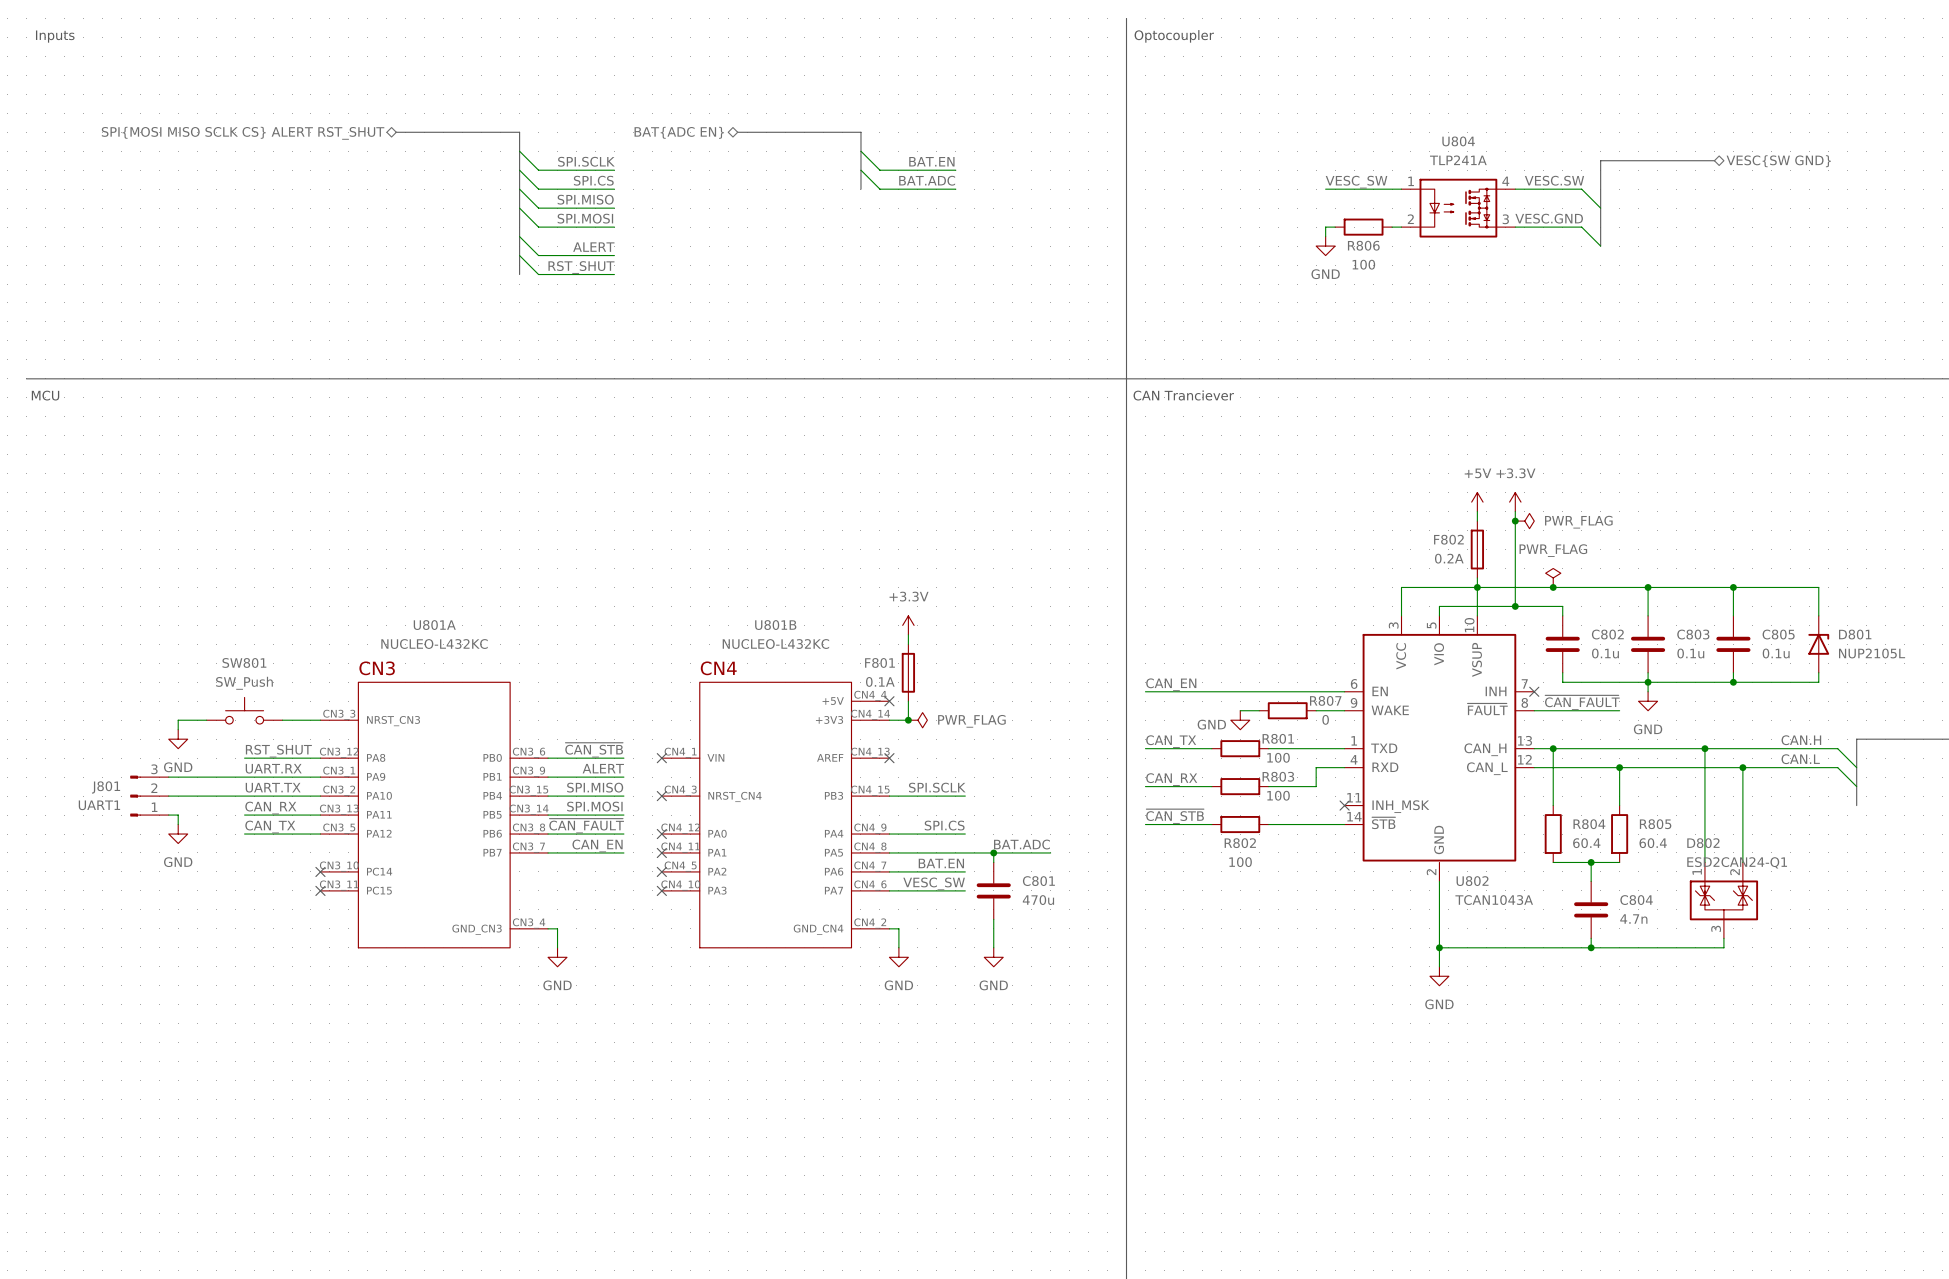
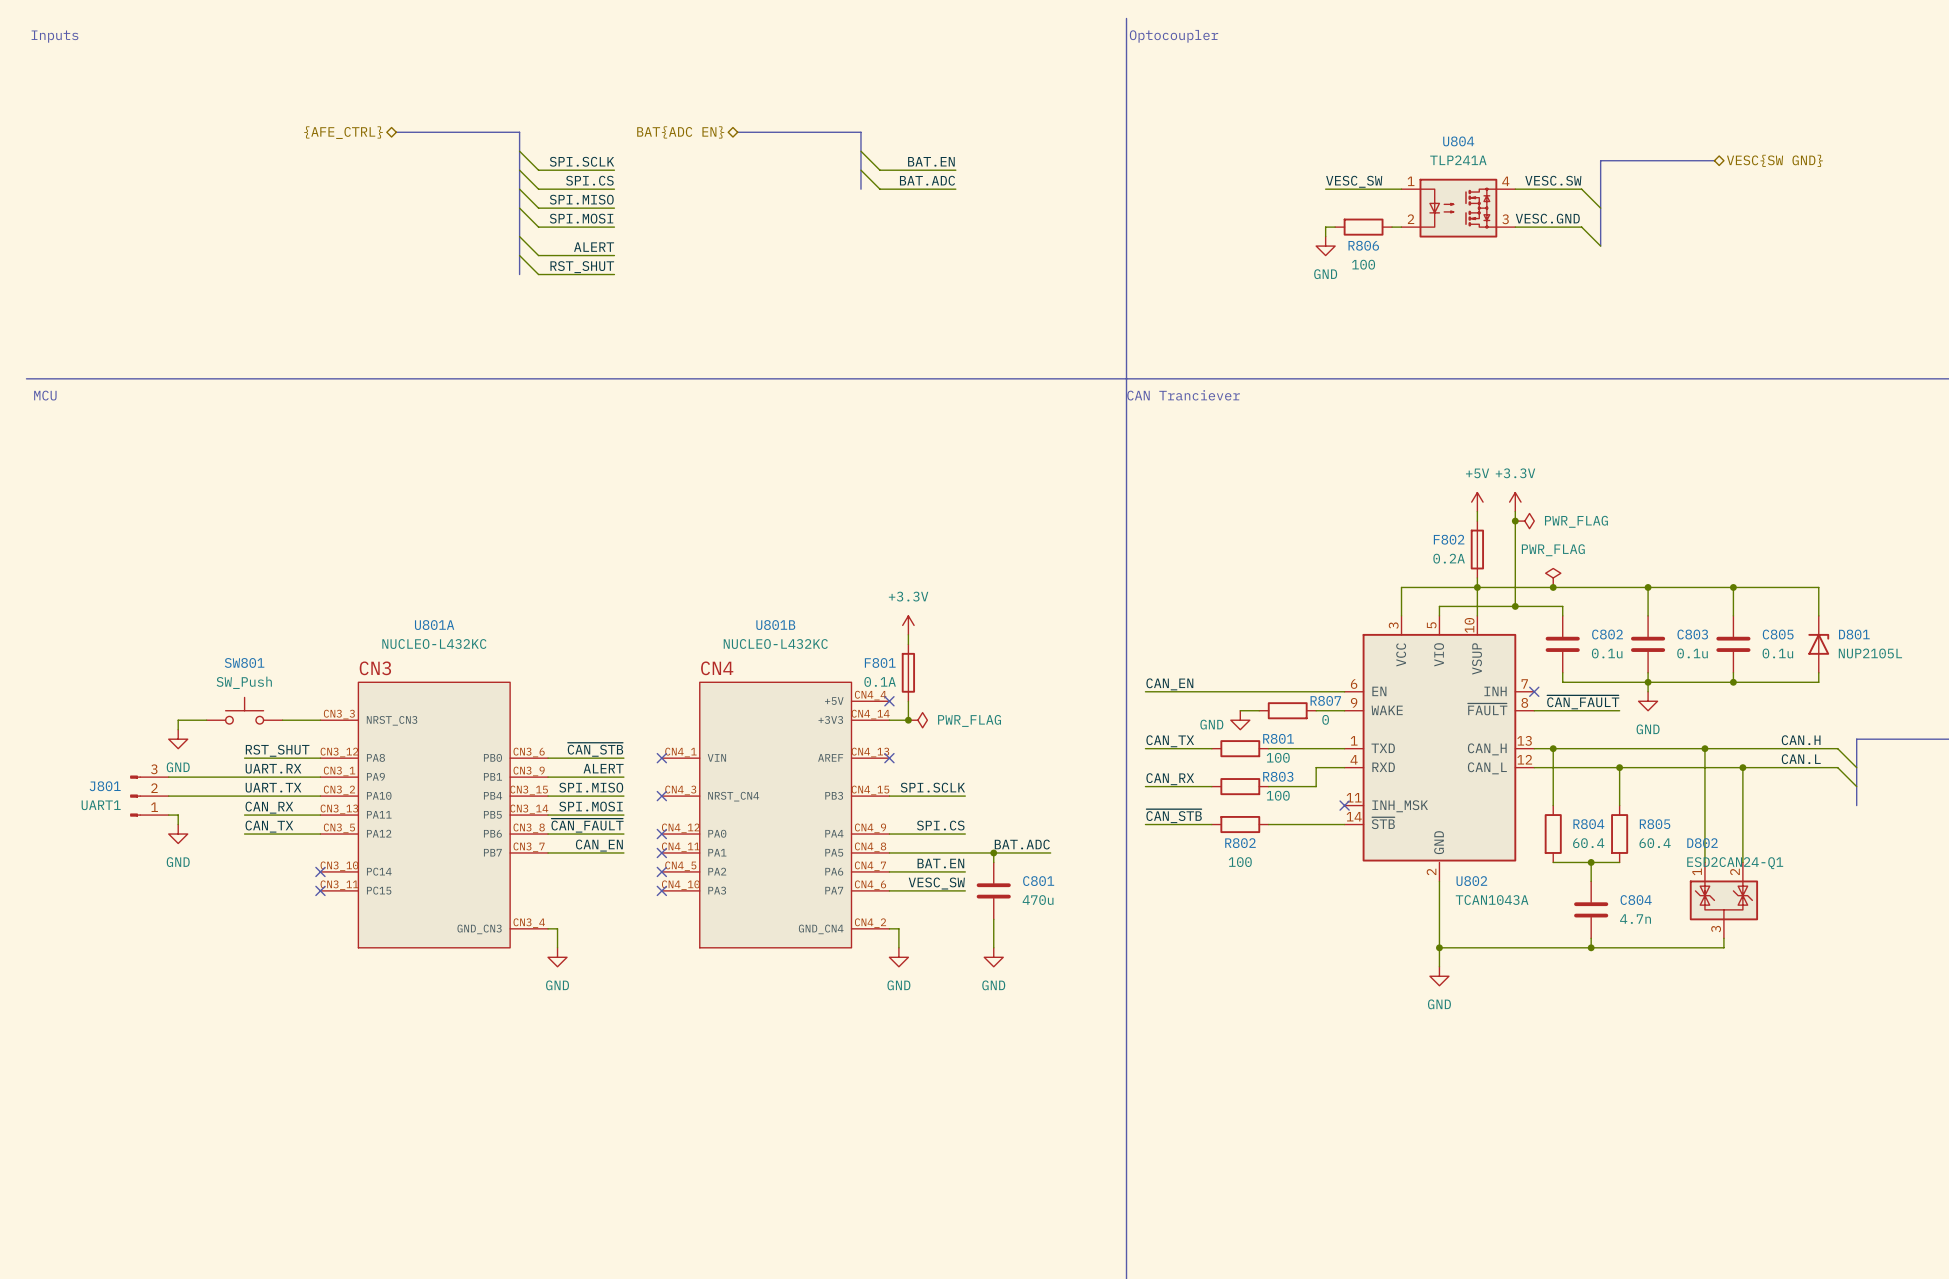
hierarchical label: SPI{MOSI MISO SCLK CS} ALERT RST_SHUT (243, 133) -> {AFE_CTRL} (343, 132)

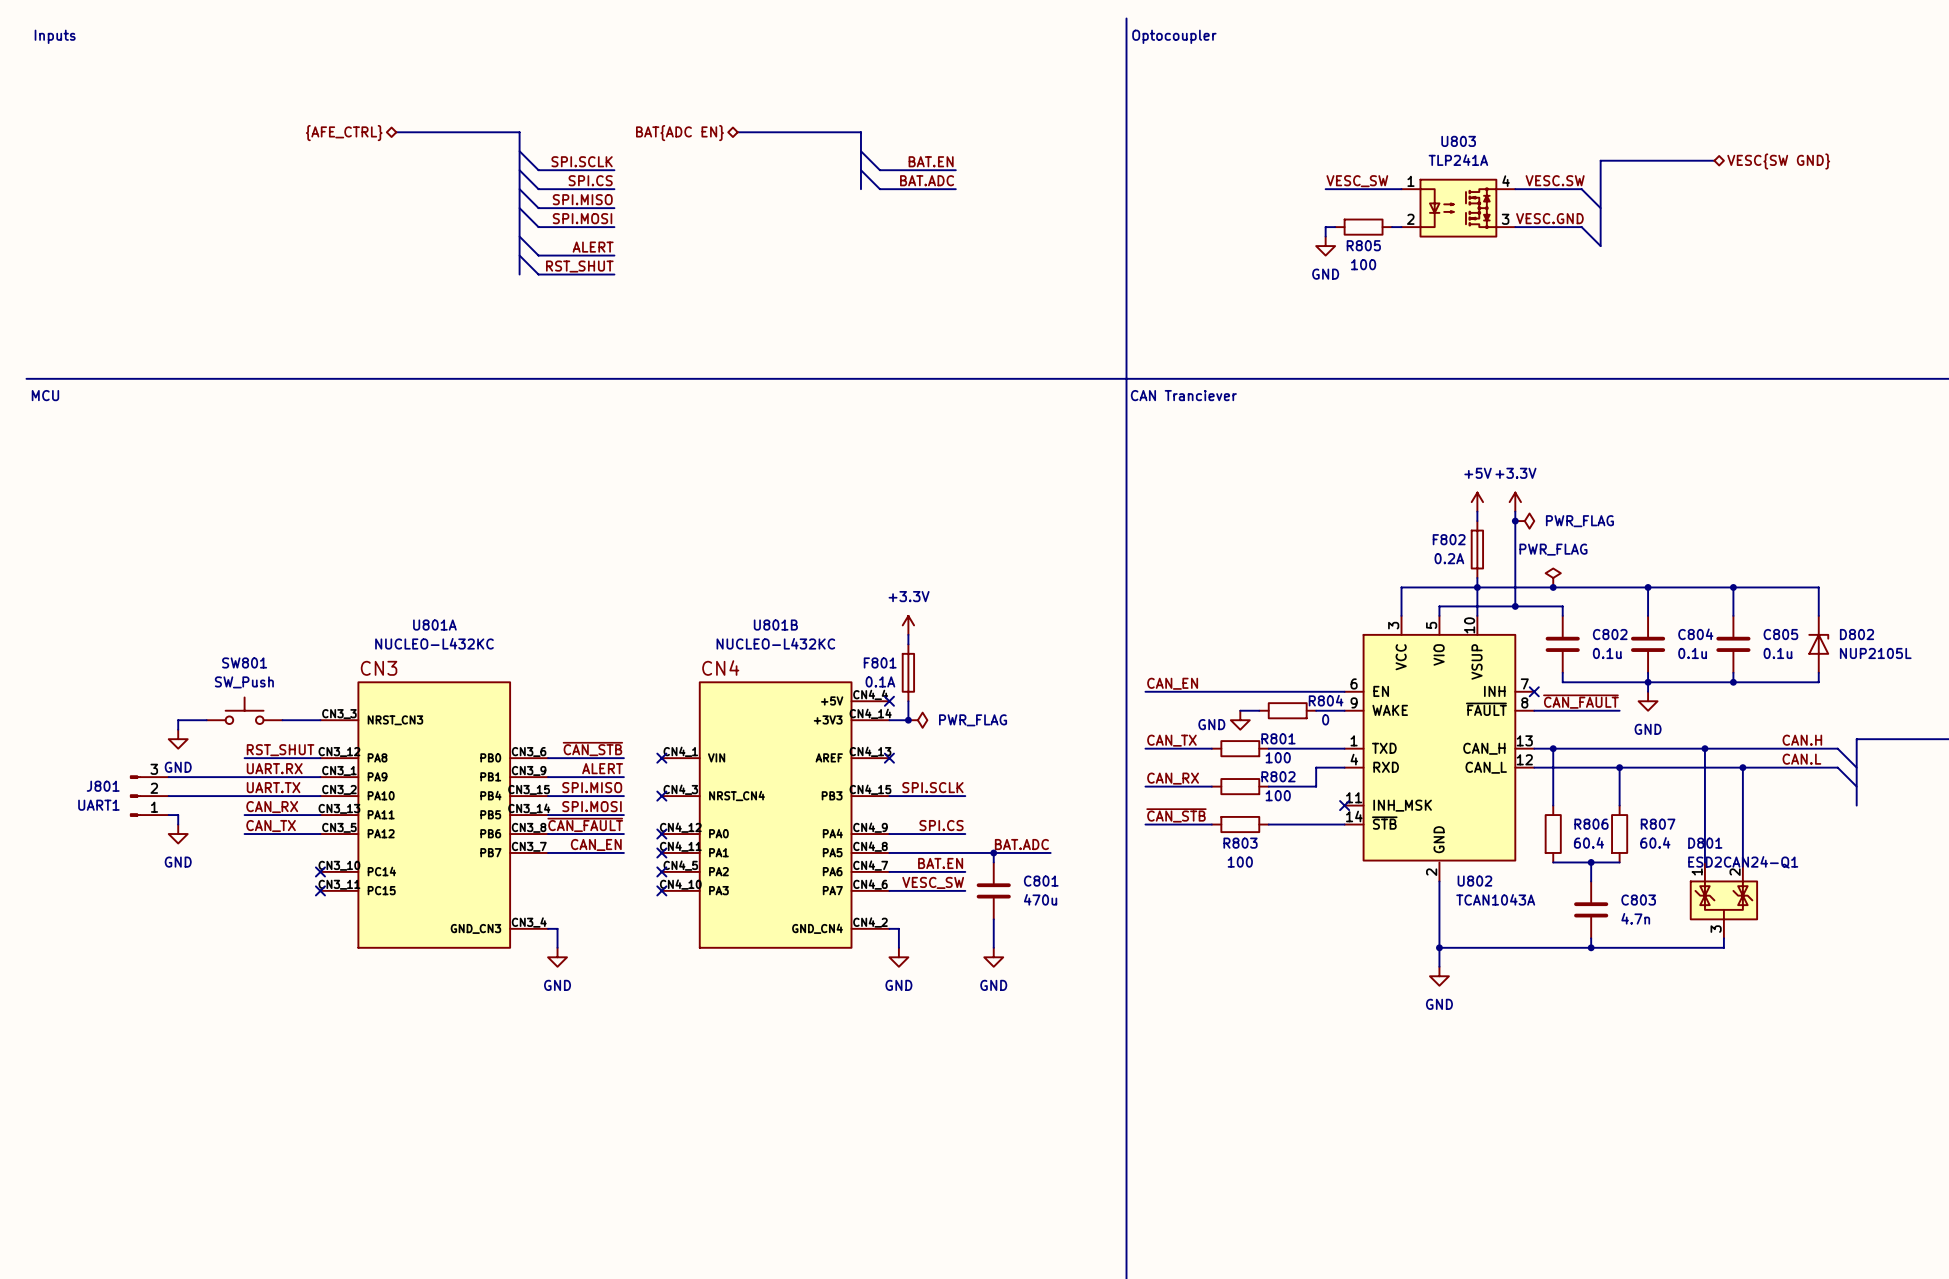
U804 name: U804 (1458, 141) -> U803 (1458, 141)
R806 name: R806 (1363, 245) -> R805 (1363, 245)
C803 name: C803 (1692, 634) -> C804 (1695, 634)
D801 name: D801 (1854, 634) -> D802 (1856, 634)
R807 name: R807 (1325, 700) -> R804 (1326, 700)
R803 name: R803 (1278, 776) -> R802 (1278, 776)
R804 name: R804 (1588, 824) -> R806 (1591, 824)
R805 name: R805 (1655, 824) -> R807 (1658, 824)
R802 name: R802 (1240, 843) -> R803 (1240, 843)
D802 name: D802 (1702, 843) -> D801 (1705, 843)
C804 name: C804 (1636, 900) -> C803 (1638, 900)

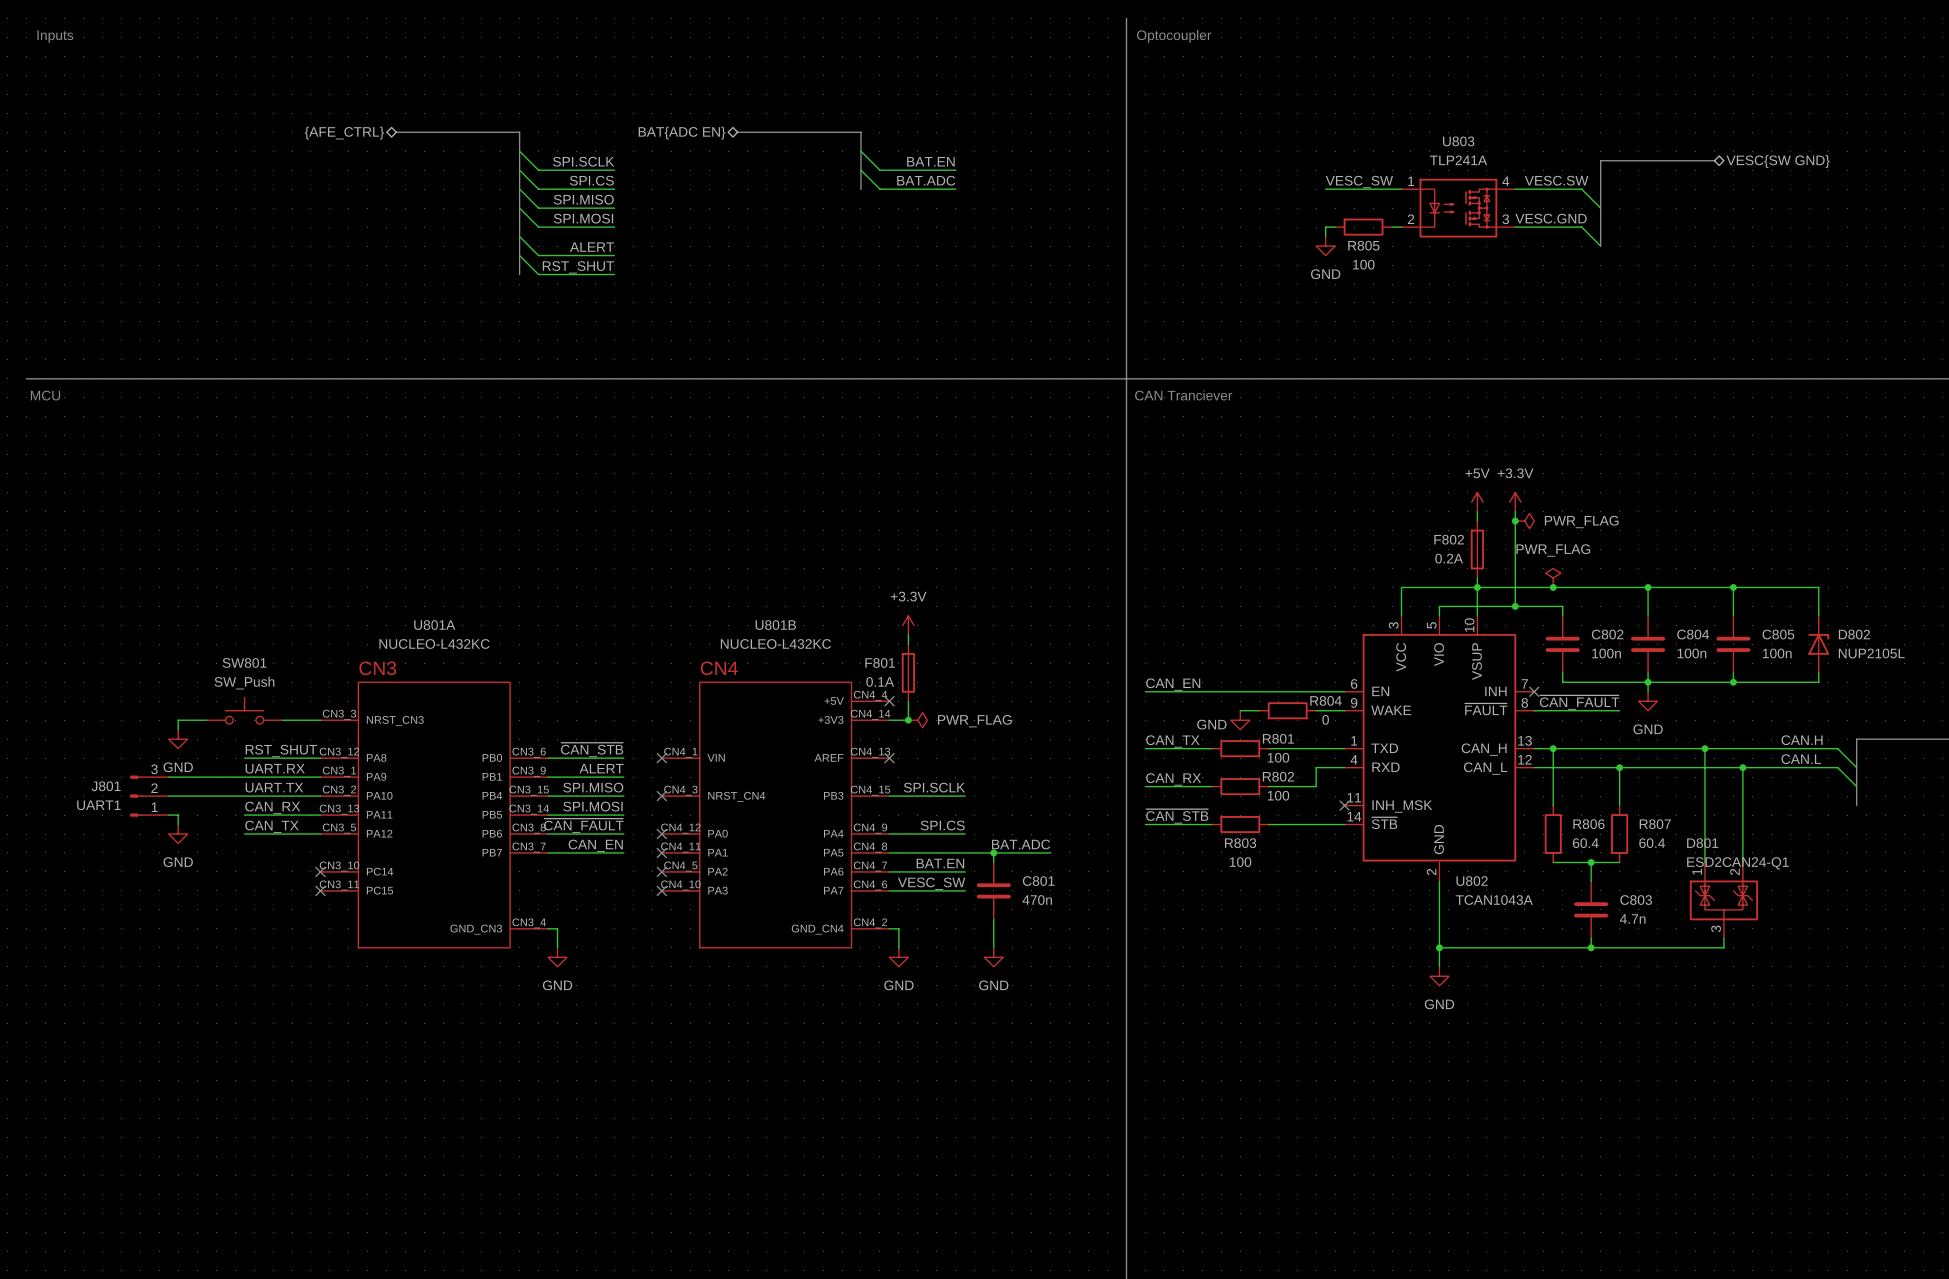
C802 value: 0.1u (1607, 653) -> 100n (1606, 653)
C804 value: 0.1u (1692, 653) -> 100n (1691, 653)
C805 value: 0.1u (1777, 653) -> 100n (1777, 653)
C801 value: 470u (1040, 899) -> 470n (1037, 900)

